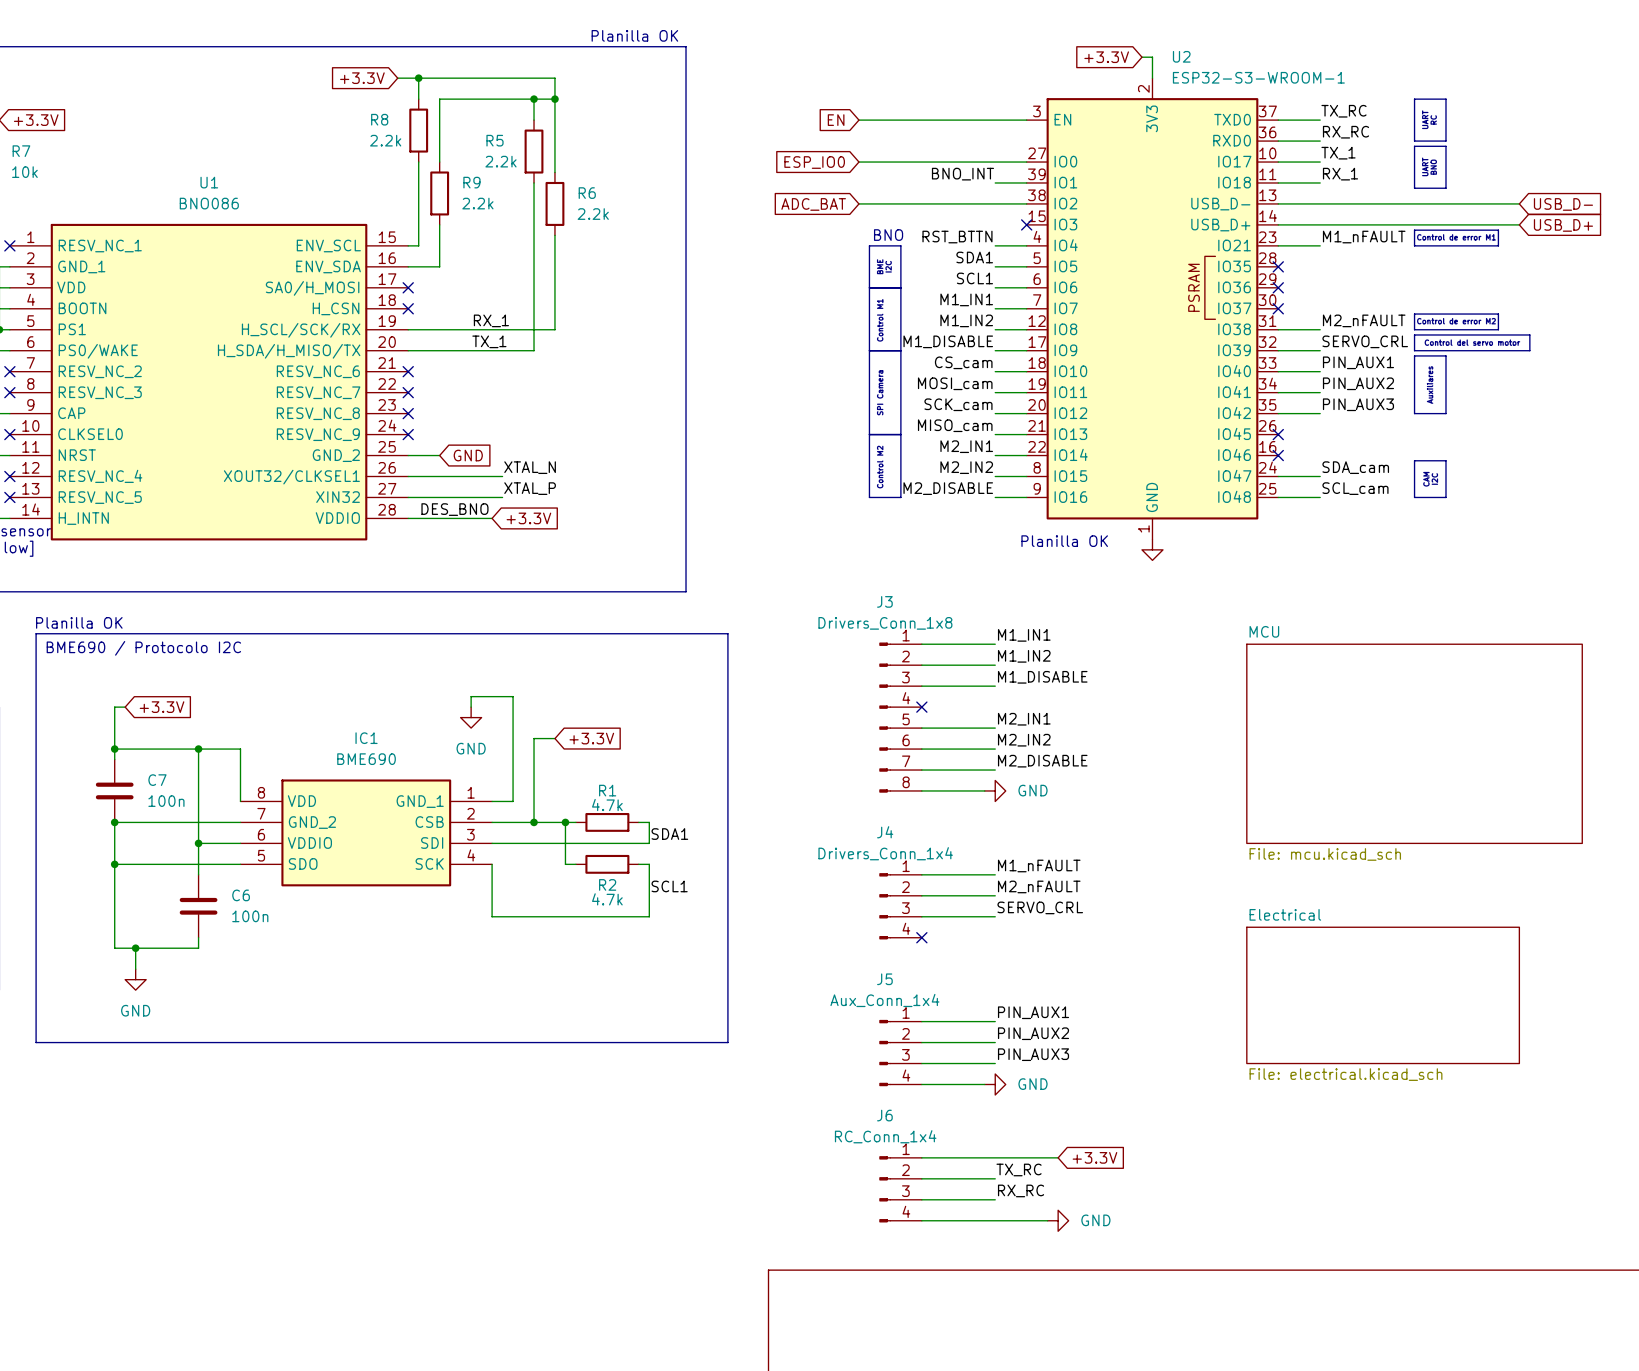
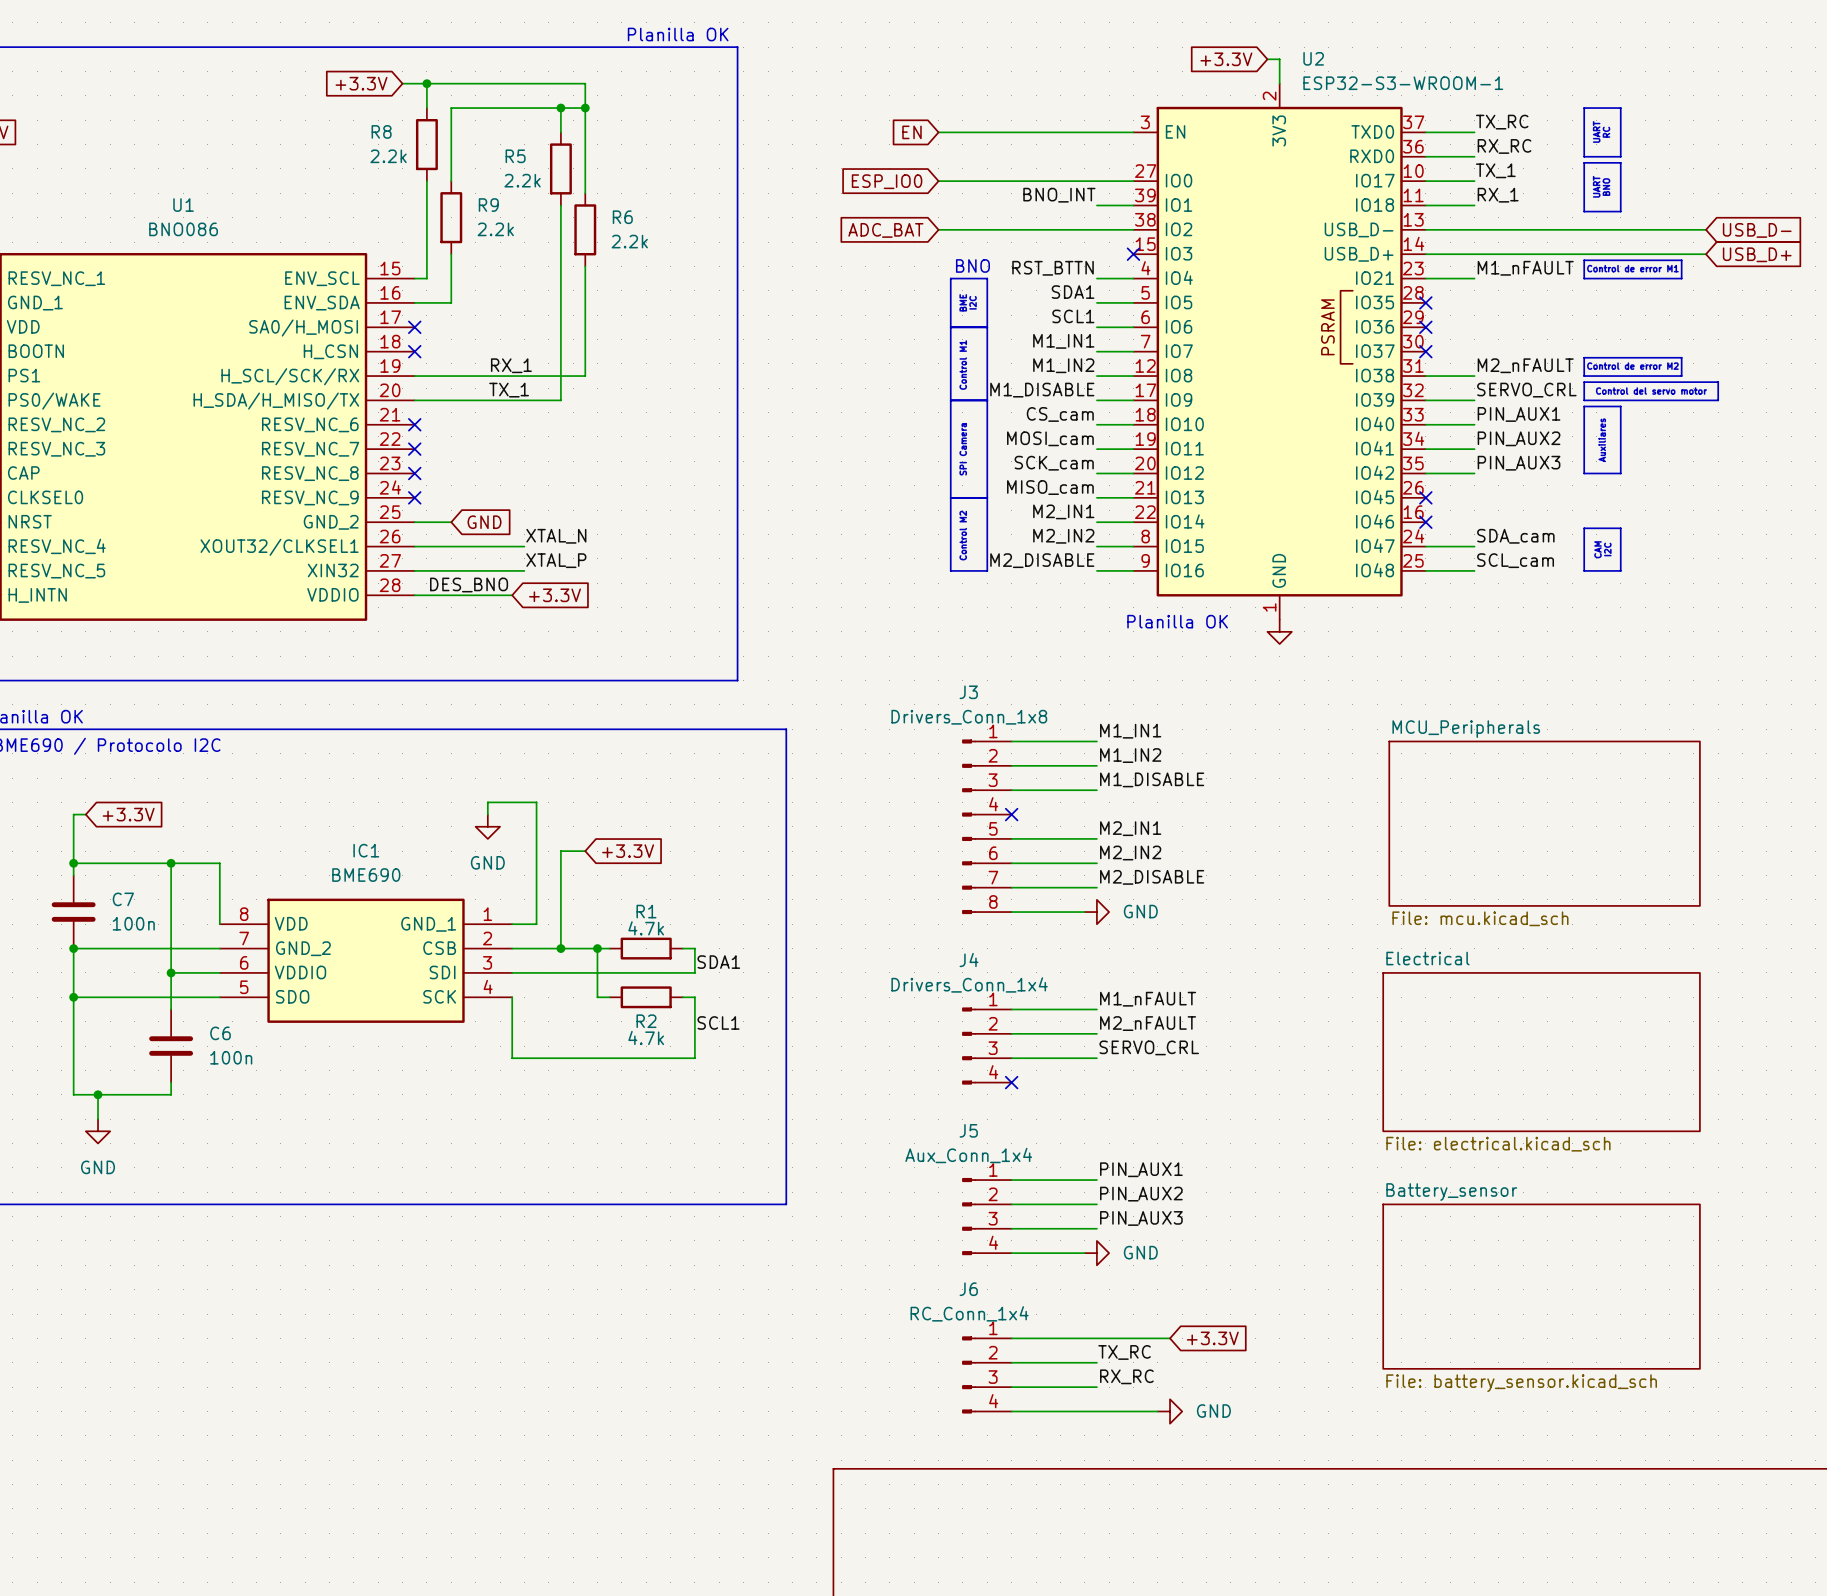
sheet MCU_Peripherals: none -> File: mcu.kicad_sch (1544, 823)
sheet MCU: File: mcu.kicad_sch (1414, 743) -> none
sheet Electrical position: (1383, 995) -> (1541, 1052)
sheet Battery_sensor: none -> File: battery_sensor.kicad_sch (1541, 1286)

